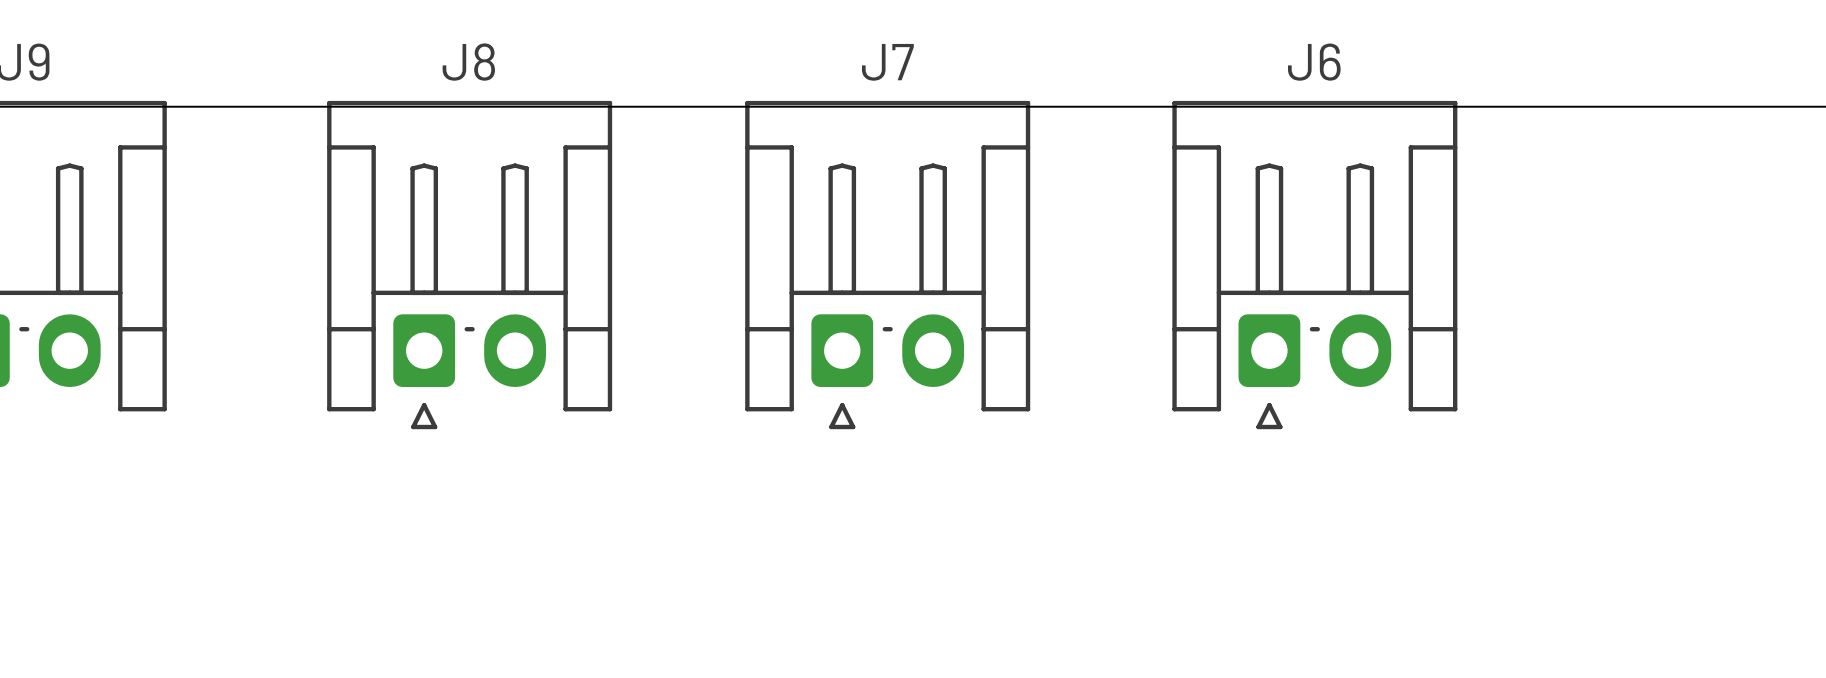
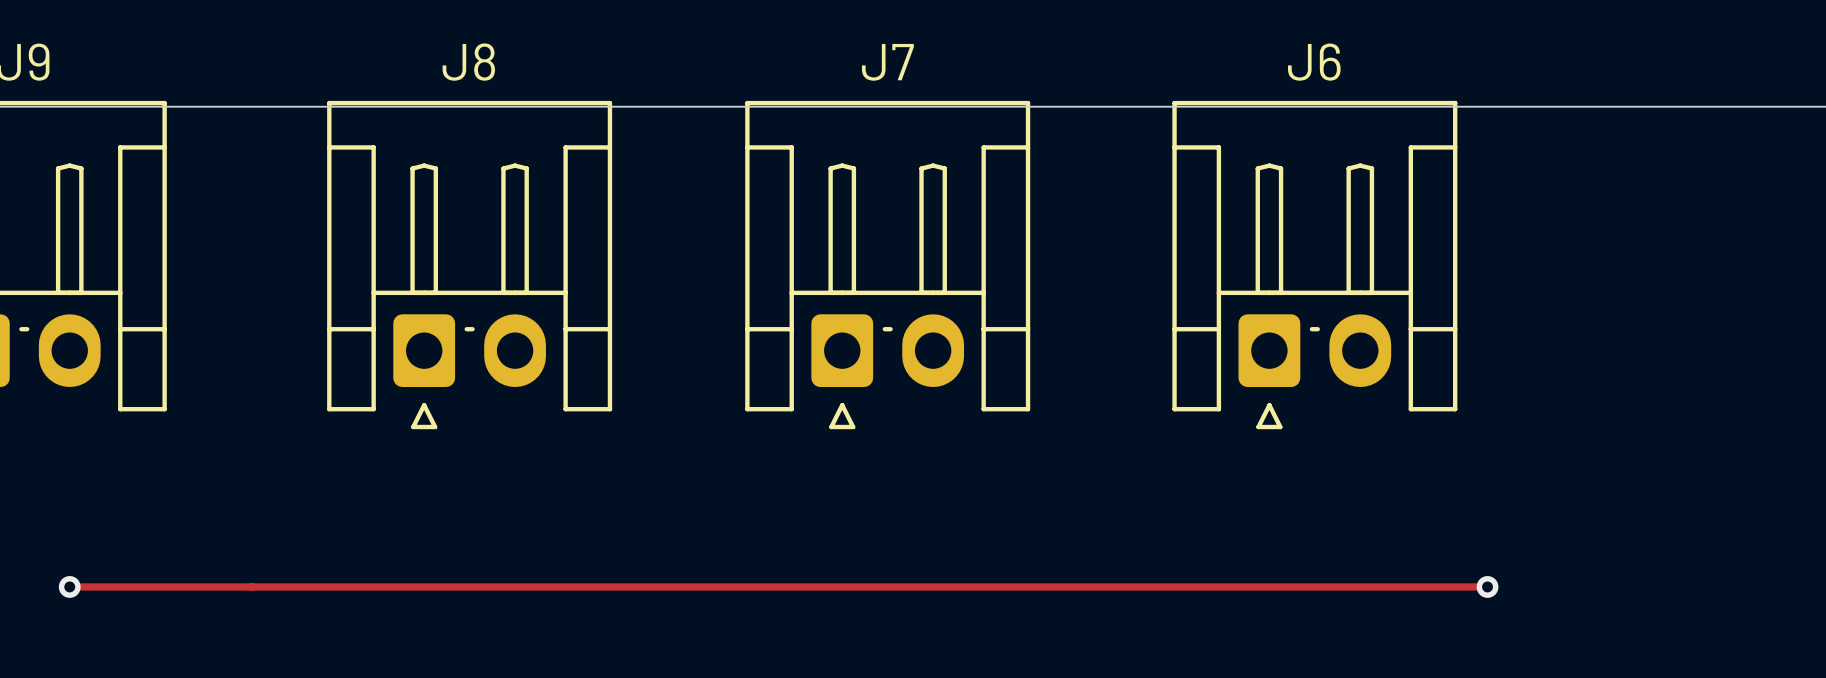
track: none -> (69, 586) (1487, 586)
via: none -> (69, 586)
via: none -> (1487, 586)

